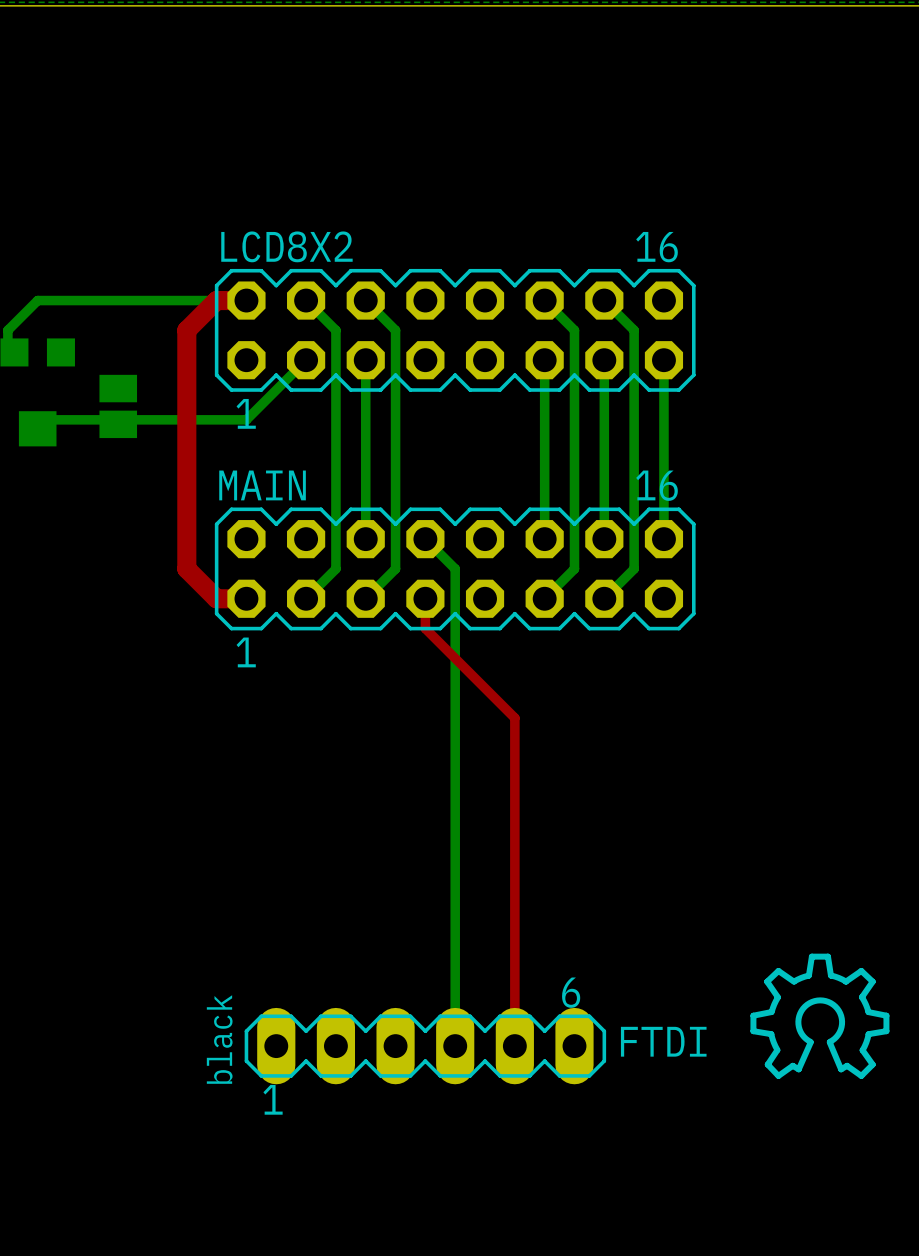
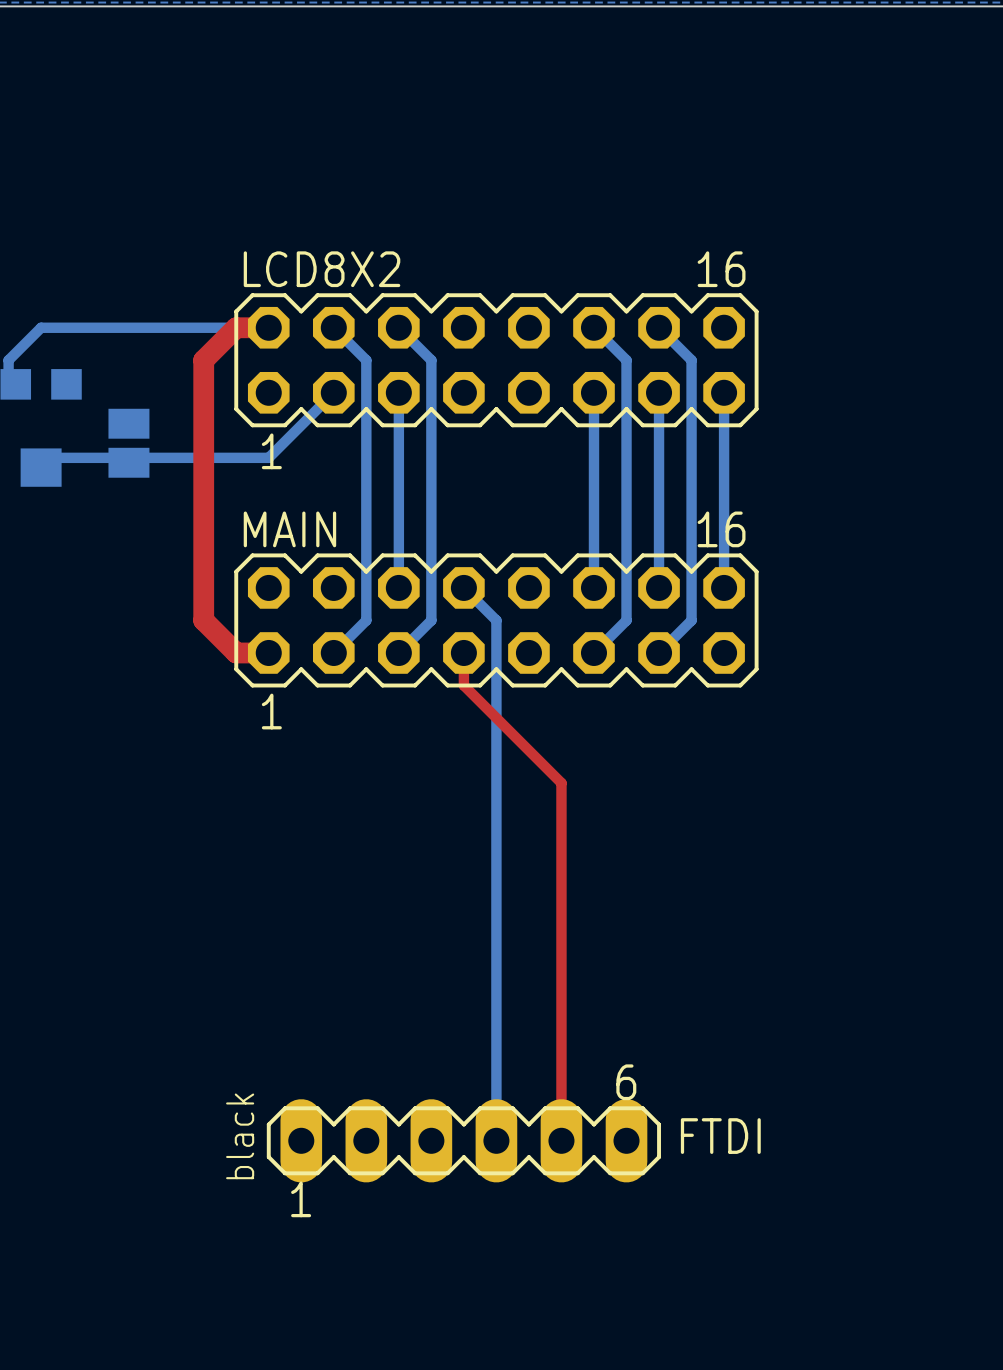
drawing: [750, 953, 890, 1079] -> none

